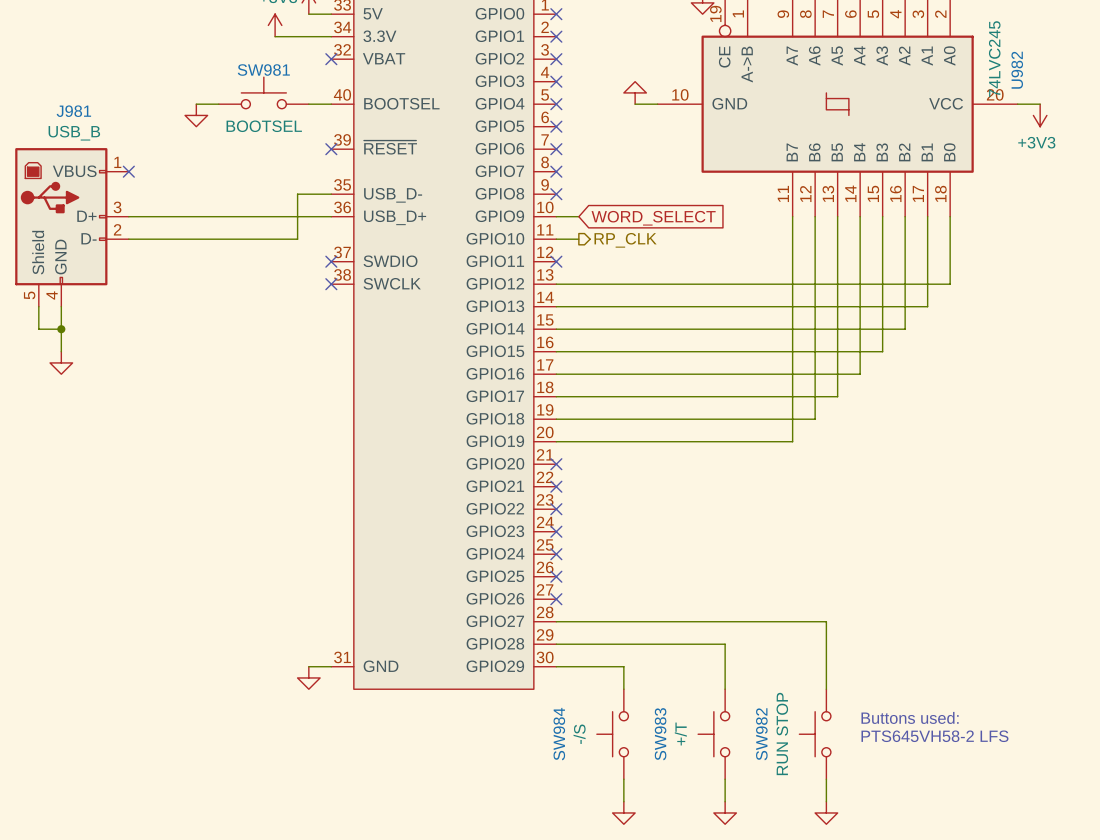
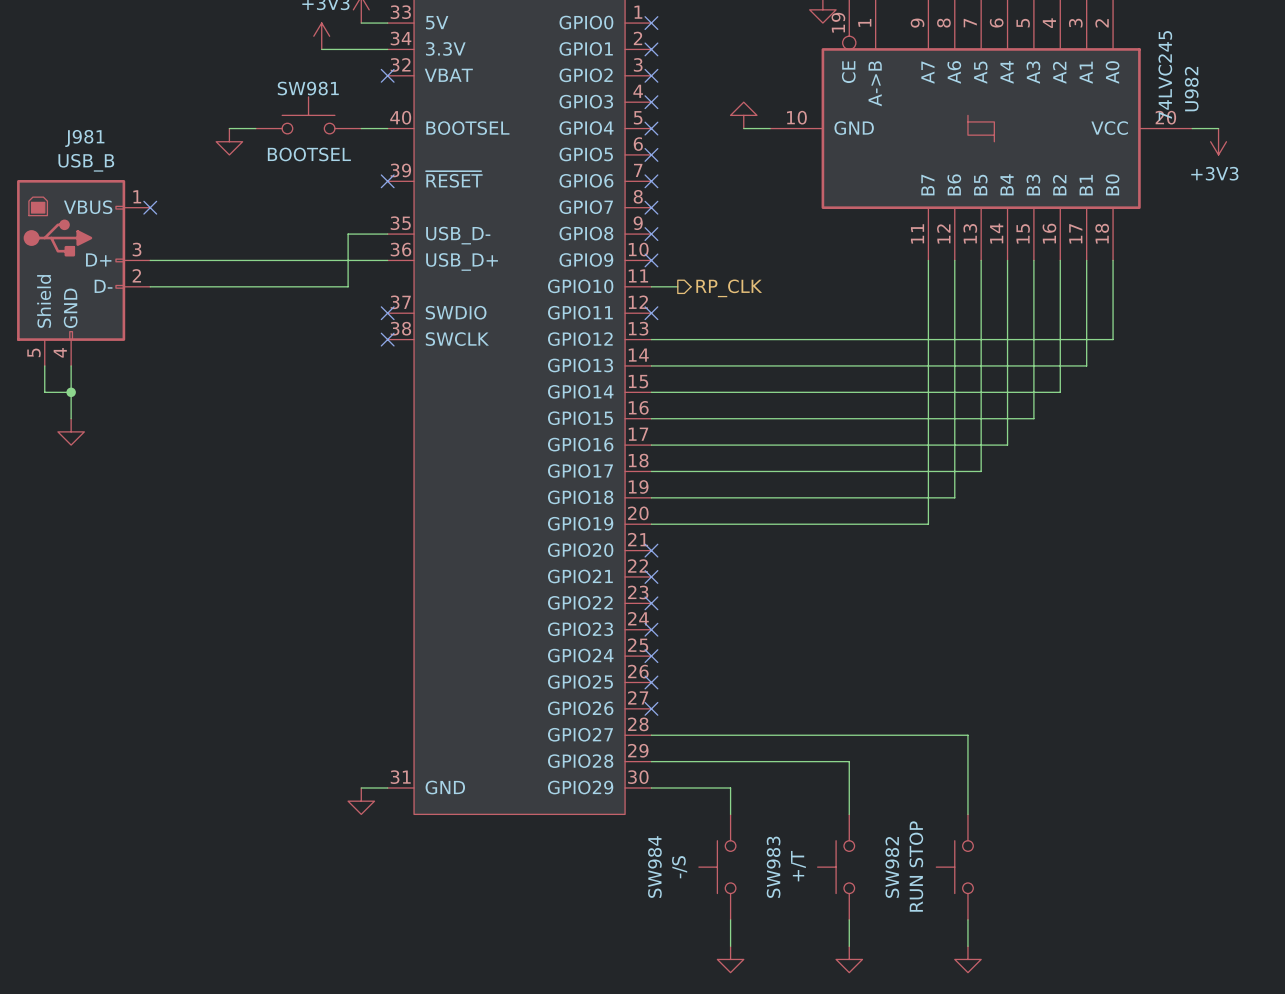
wire: (556, 216) (578, 216) -> none
no-connect mark: none -> (651, 260)
global label: WORD_SELECT (653, 218) -> none
text: Buttons used: (910, 717) -> none
text: PTS645VH58-2 LFS (934, 736) -> none

